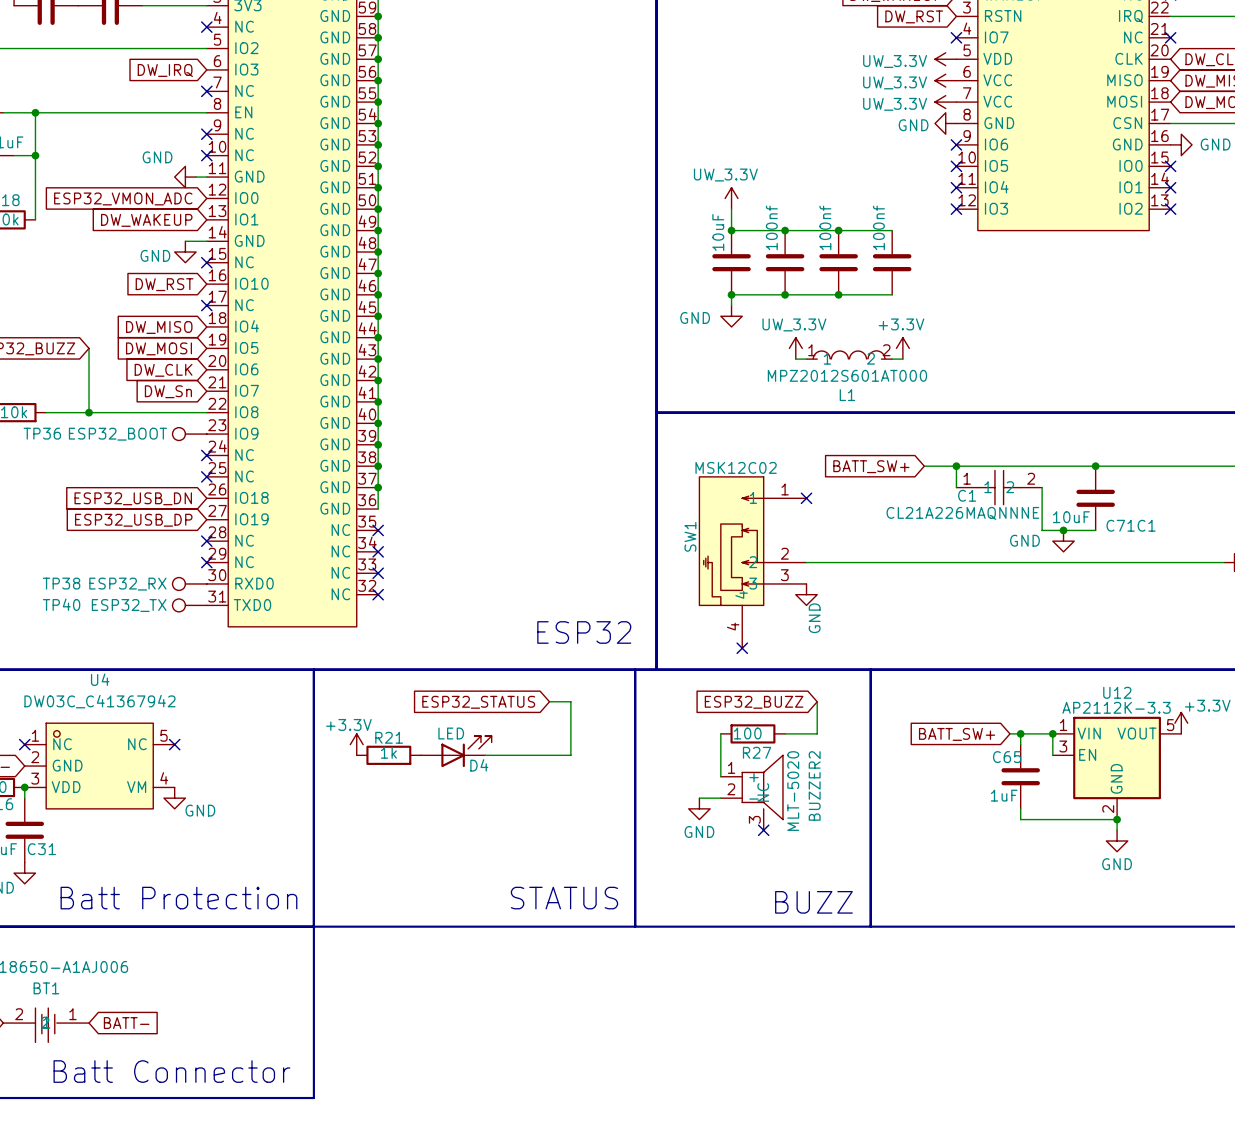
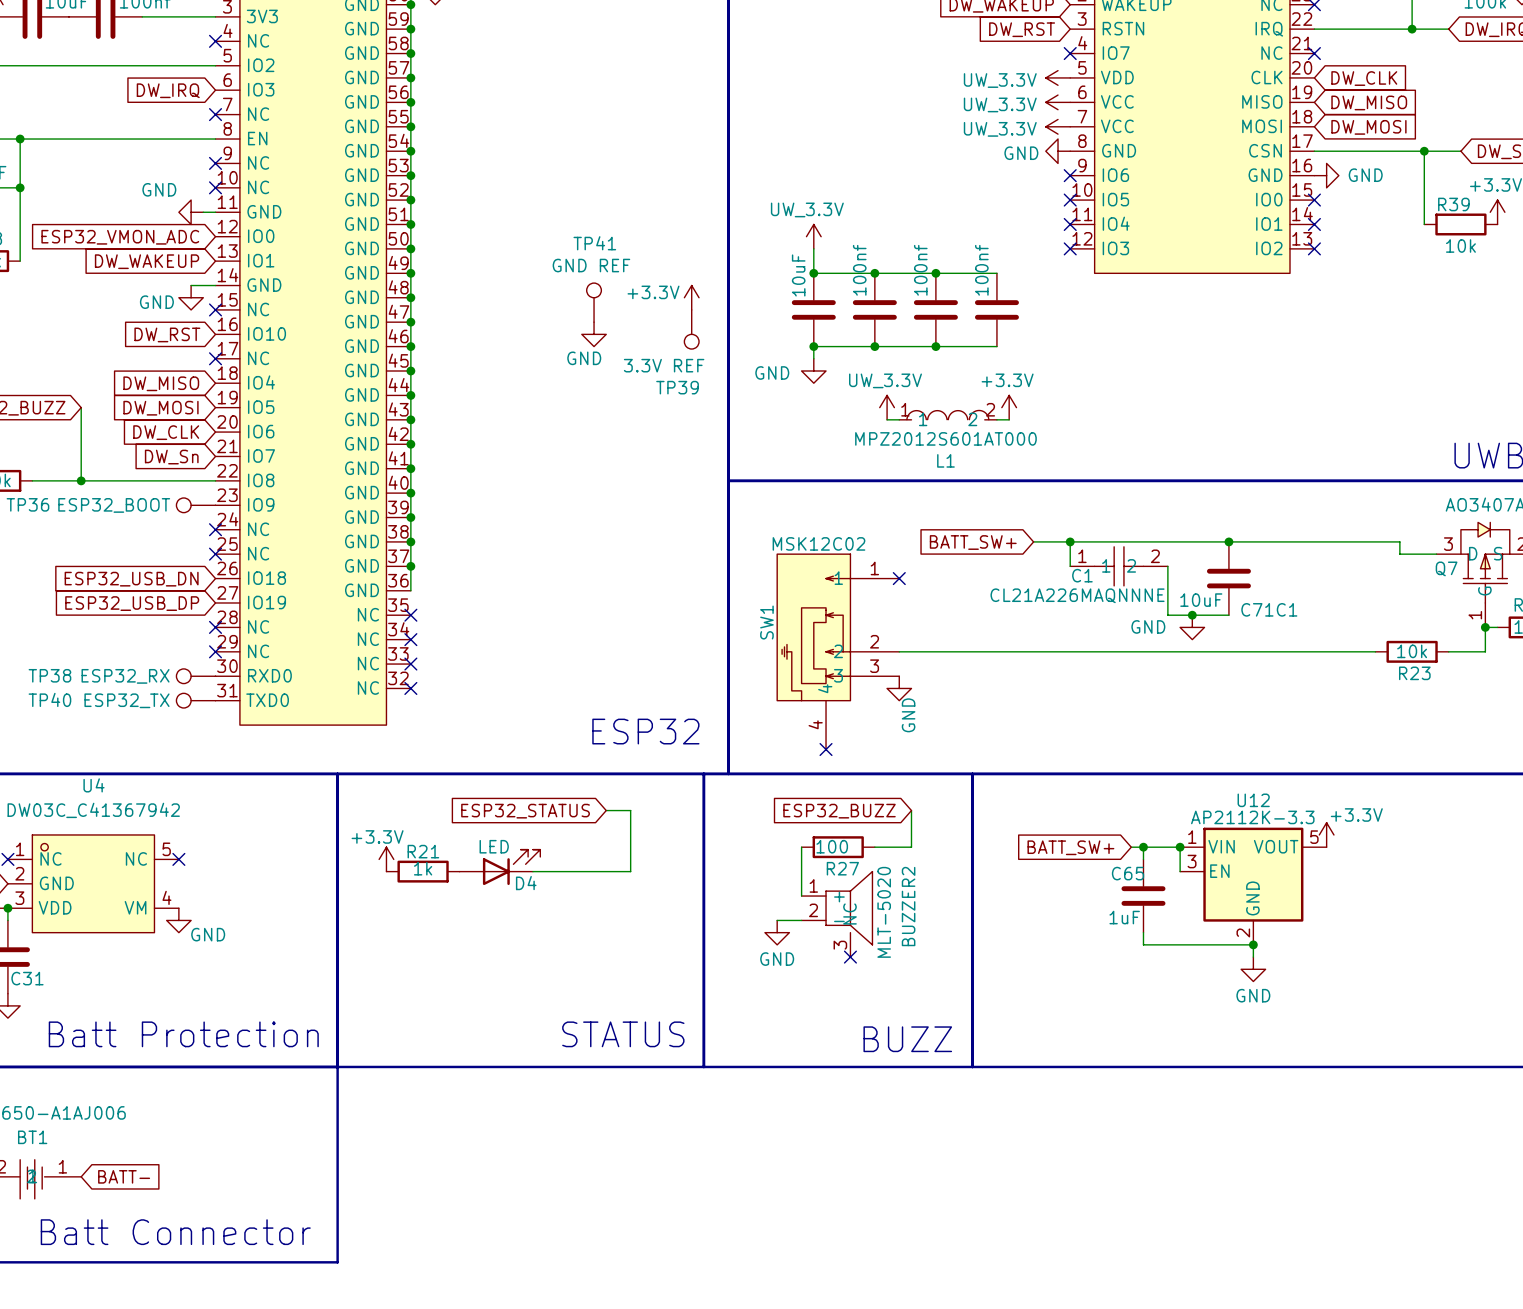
power symbol: none -> +3.3V (691, 297)
TP41: none -> GND REF (594, 302)
TP39: none -> 3.3V REF (691, 329)
power symbol: none -> GND (594, 334)

